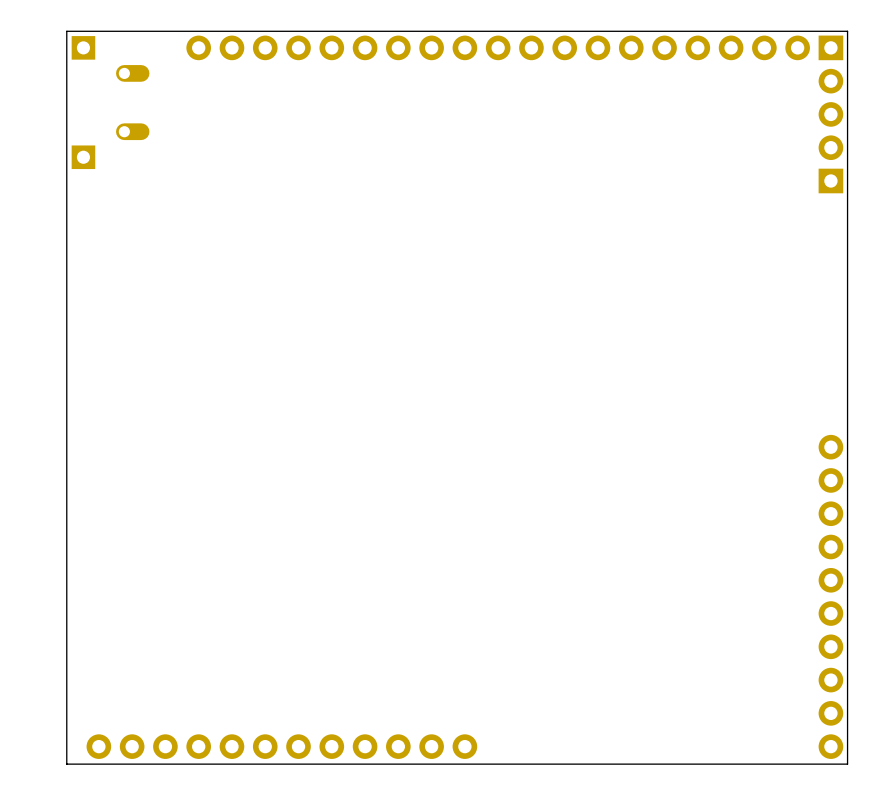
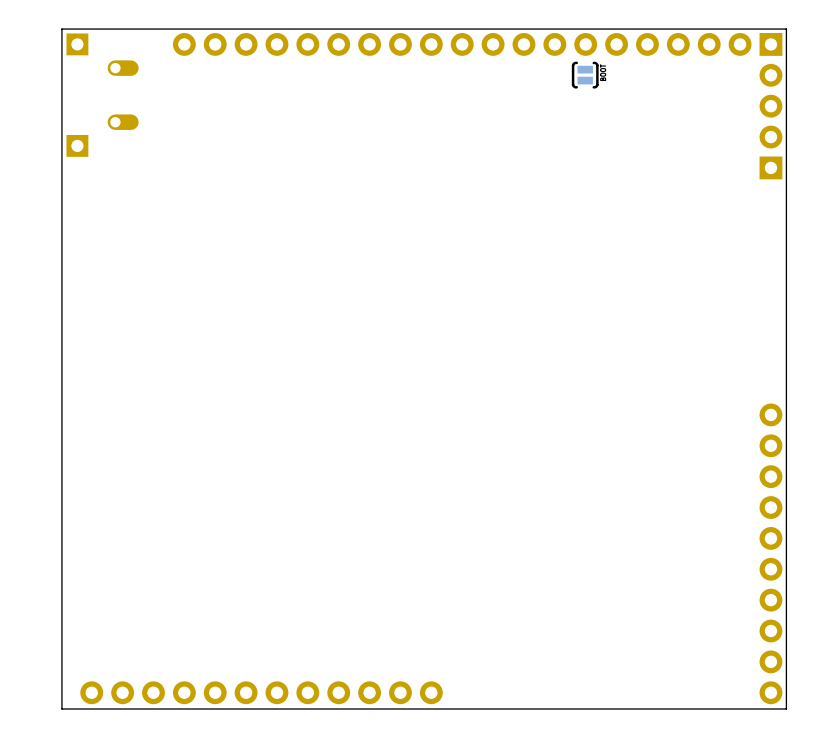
part: none -> (585, 75)

